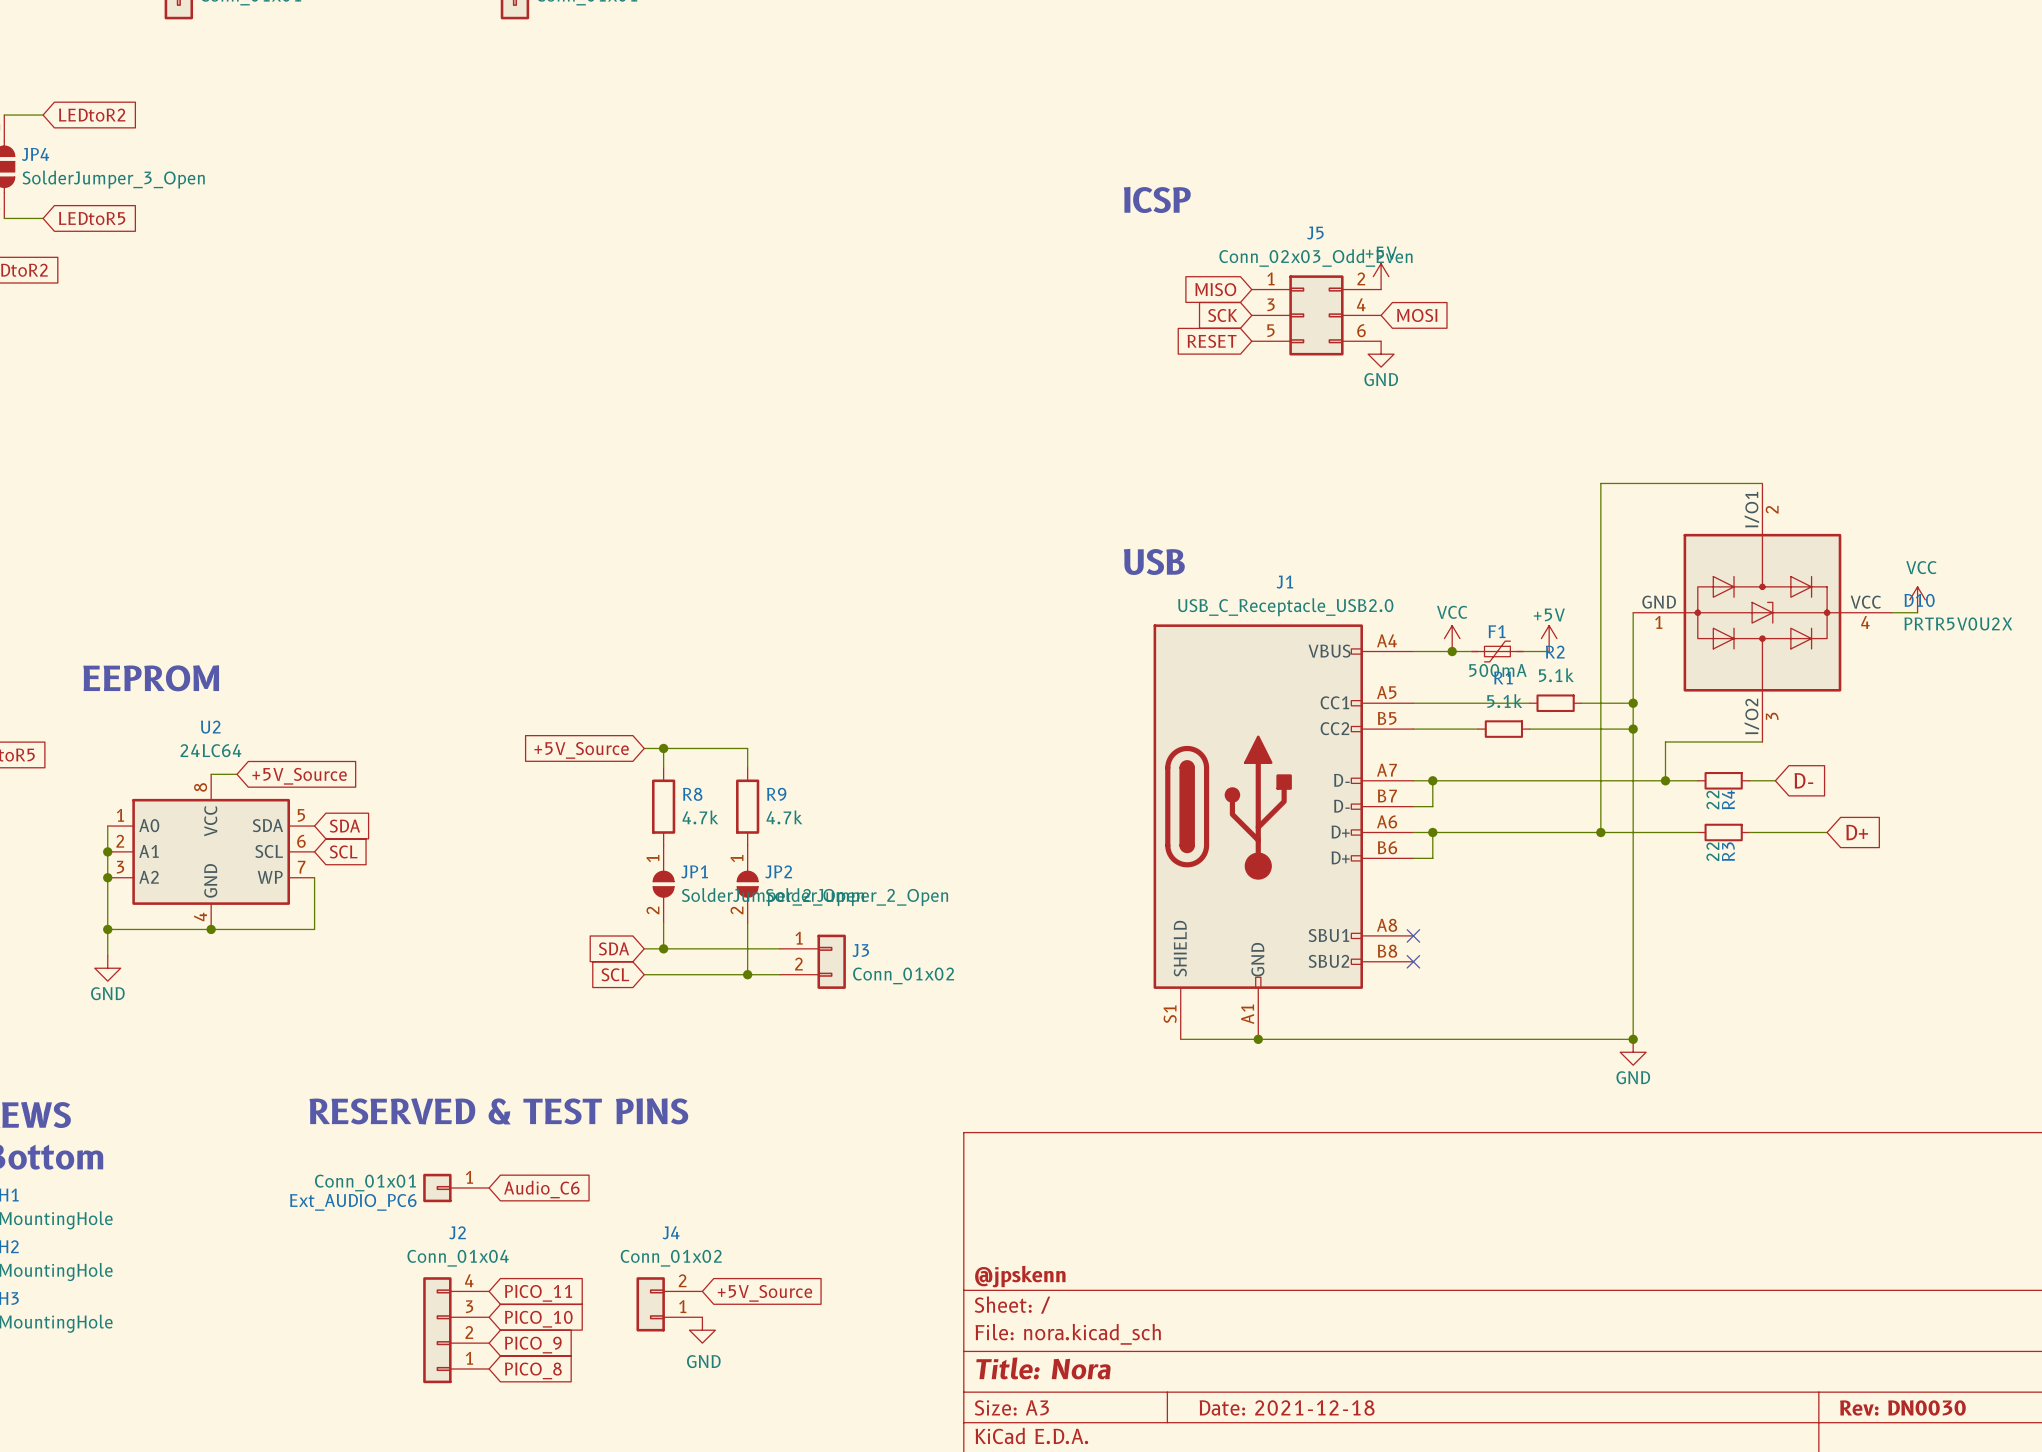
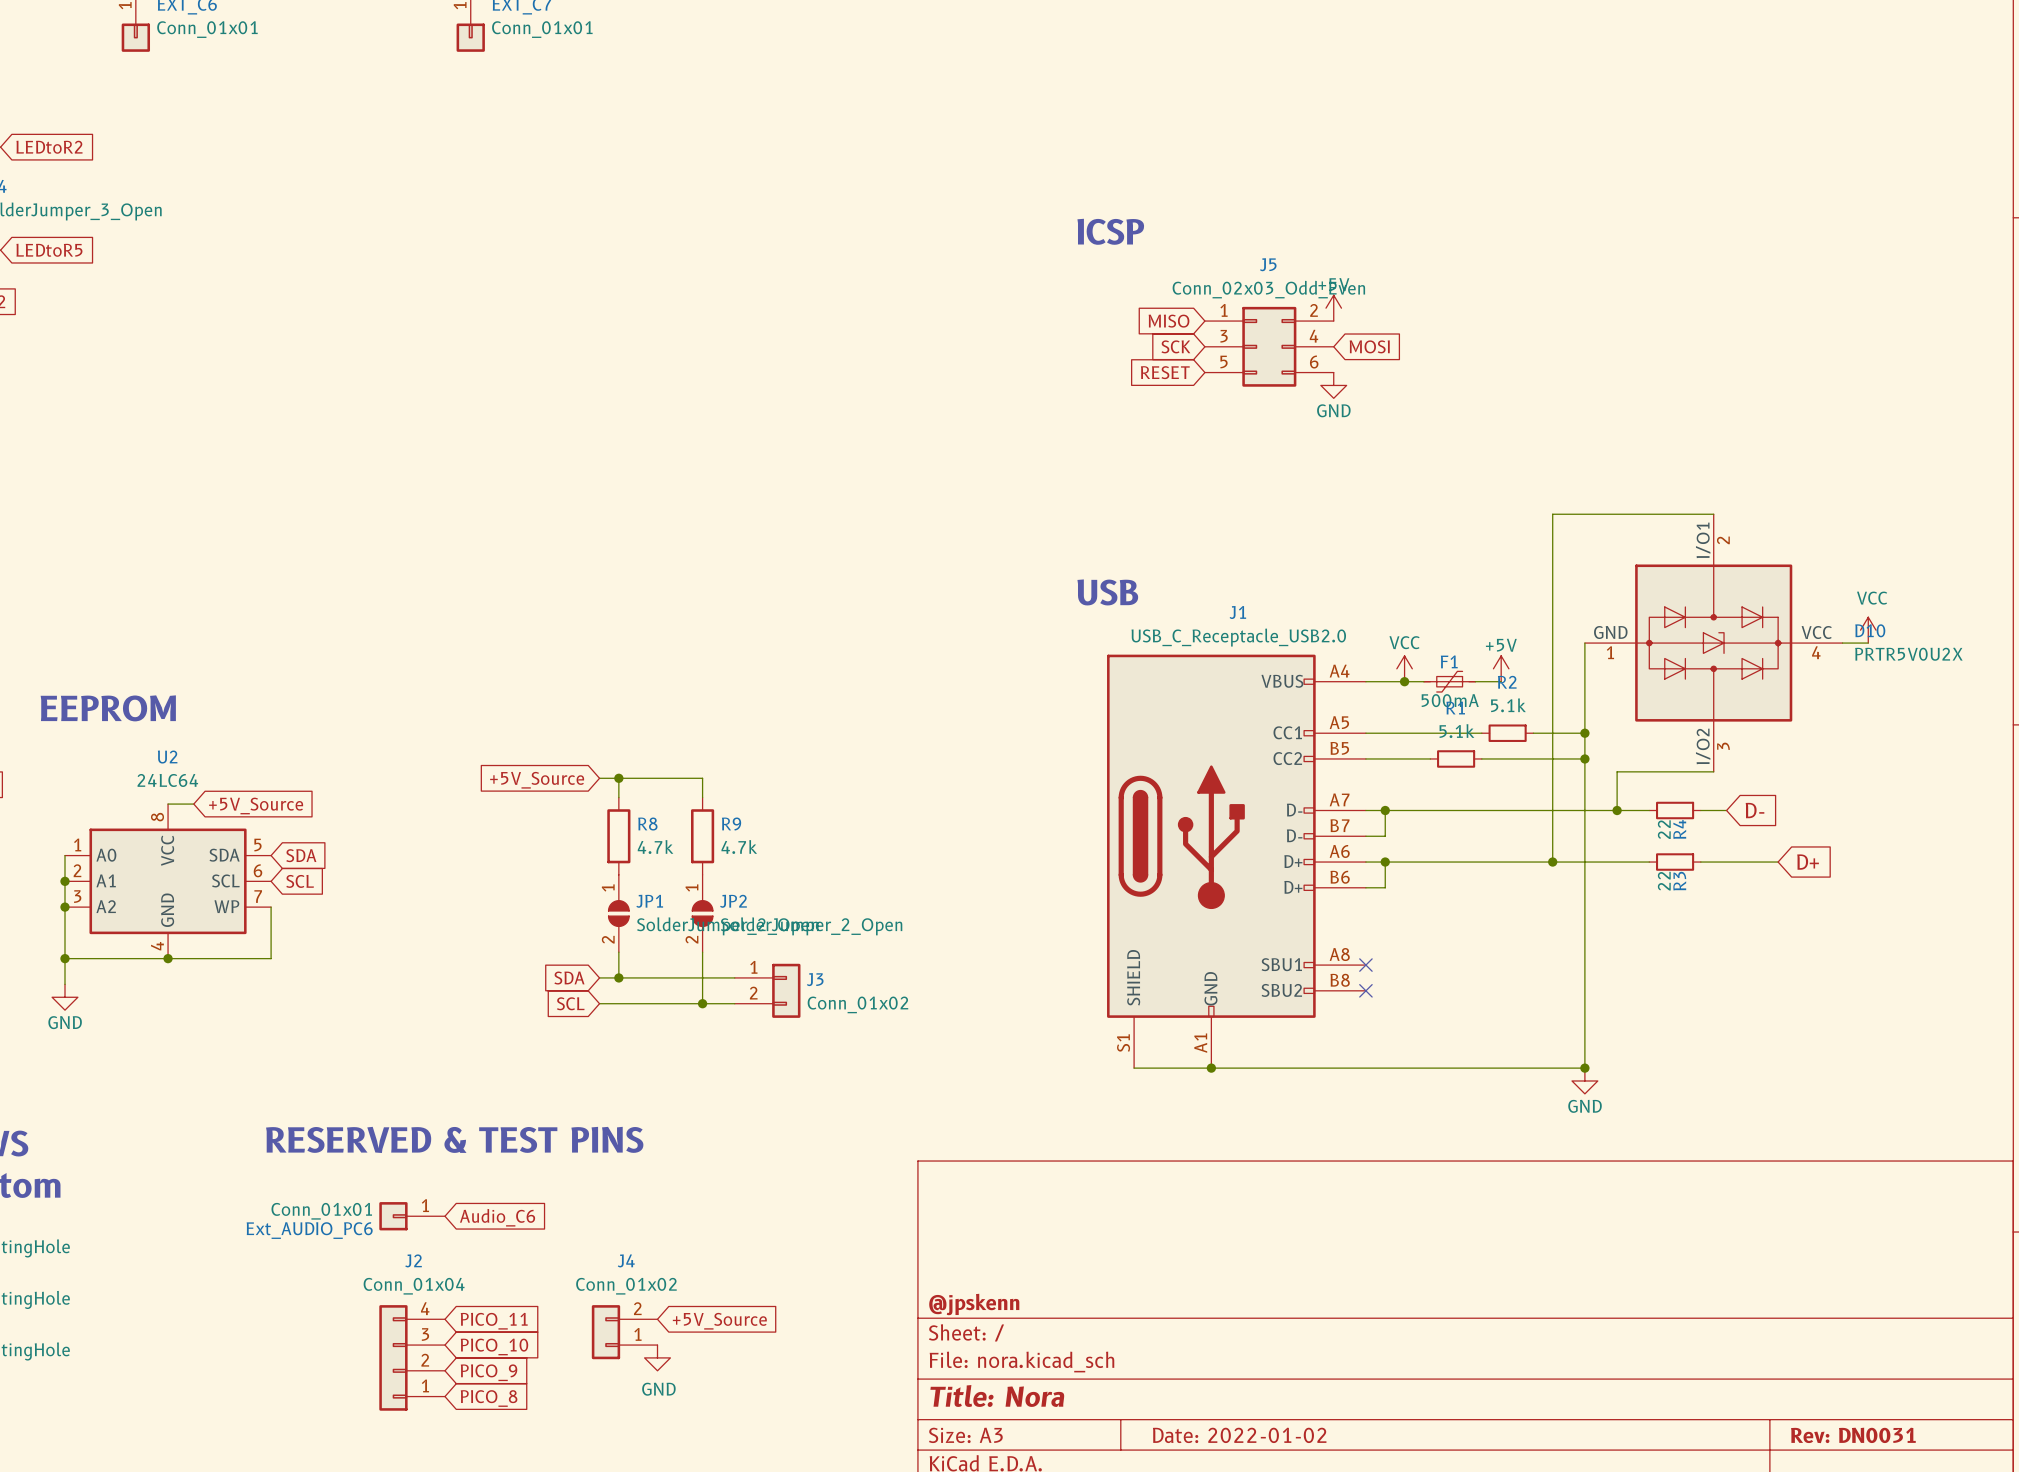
title block: Date: 2021-12-18 (1287, 1407) -> Date: 2022-01-02 (1239, 1435)
title block: Rev: DN0030 (1902, 1407) -> Rev: DN0031 (1853, 1435)

